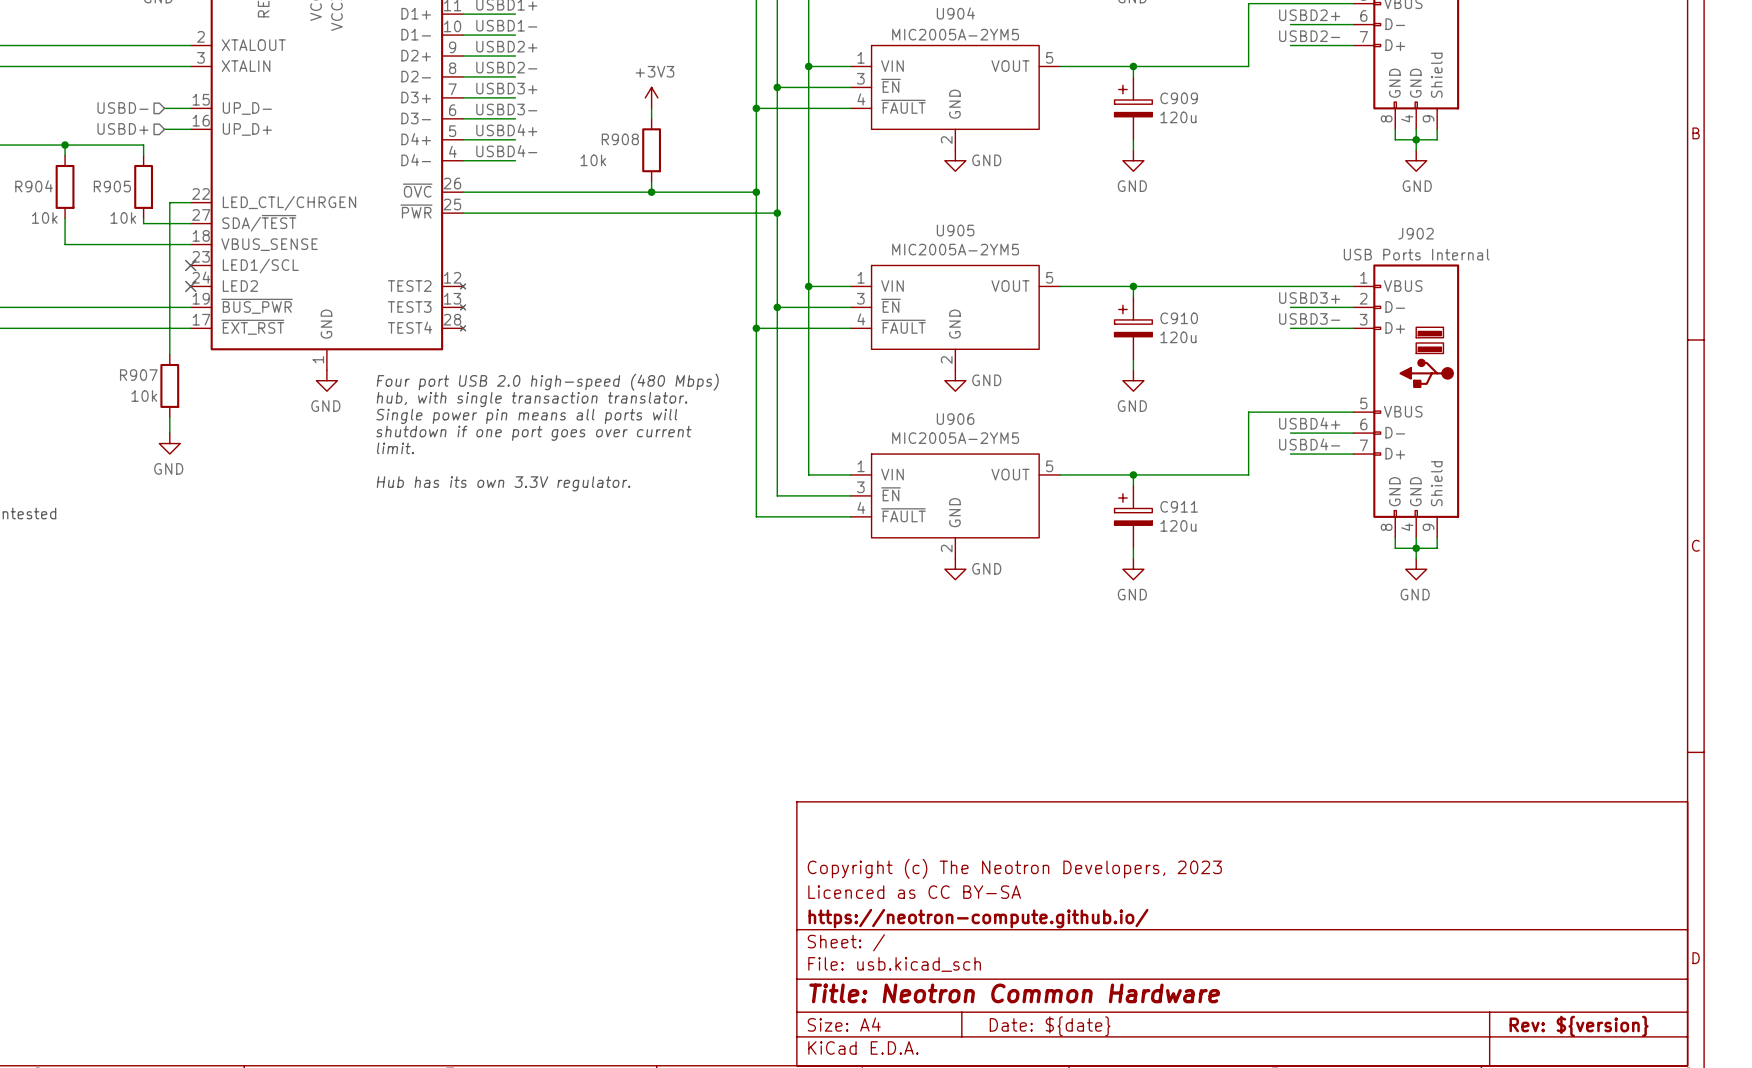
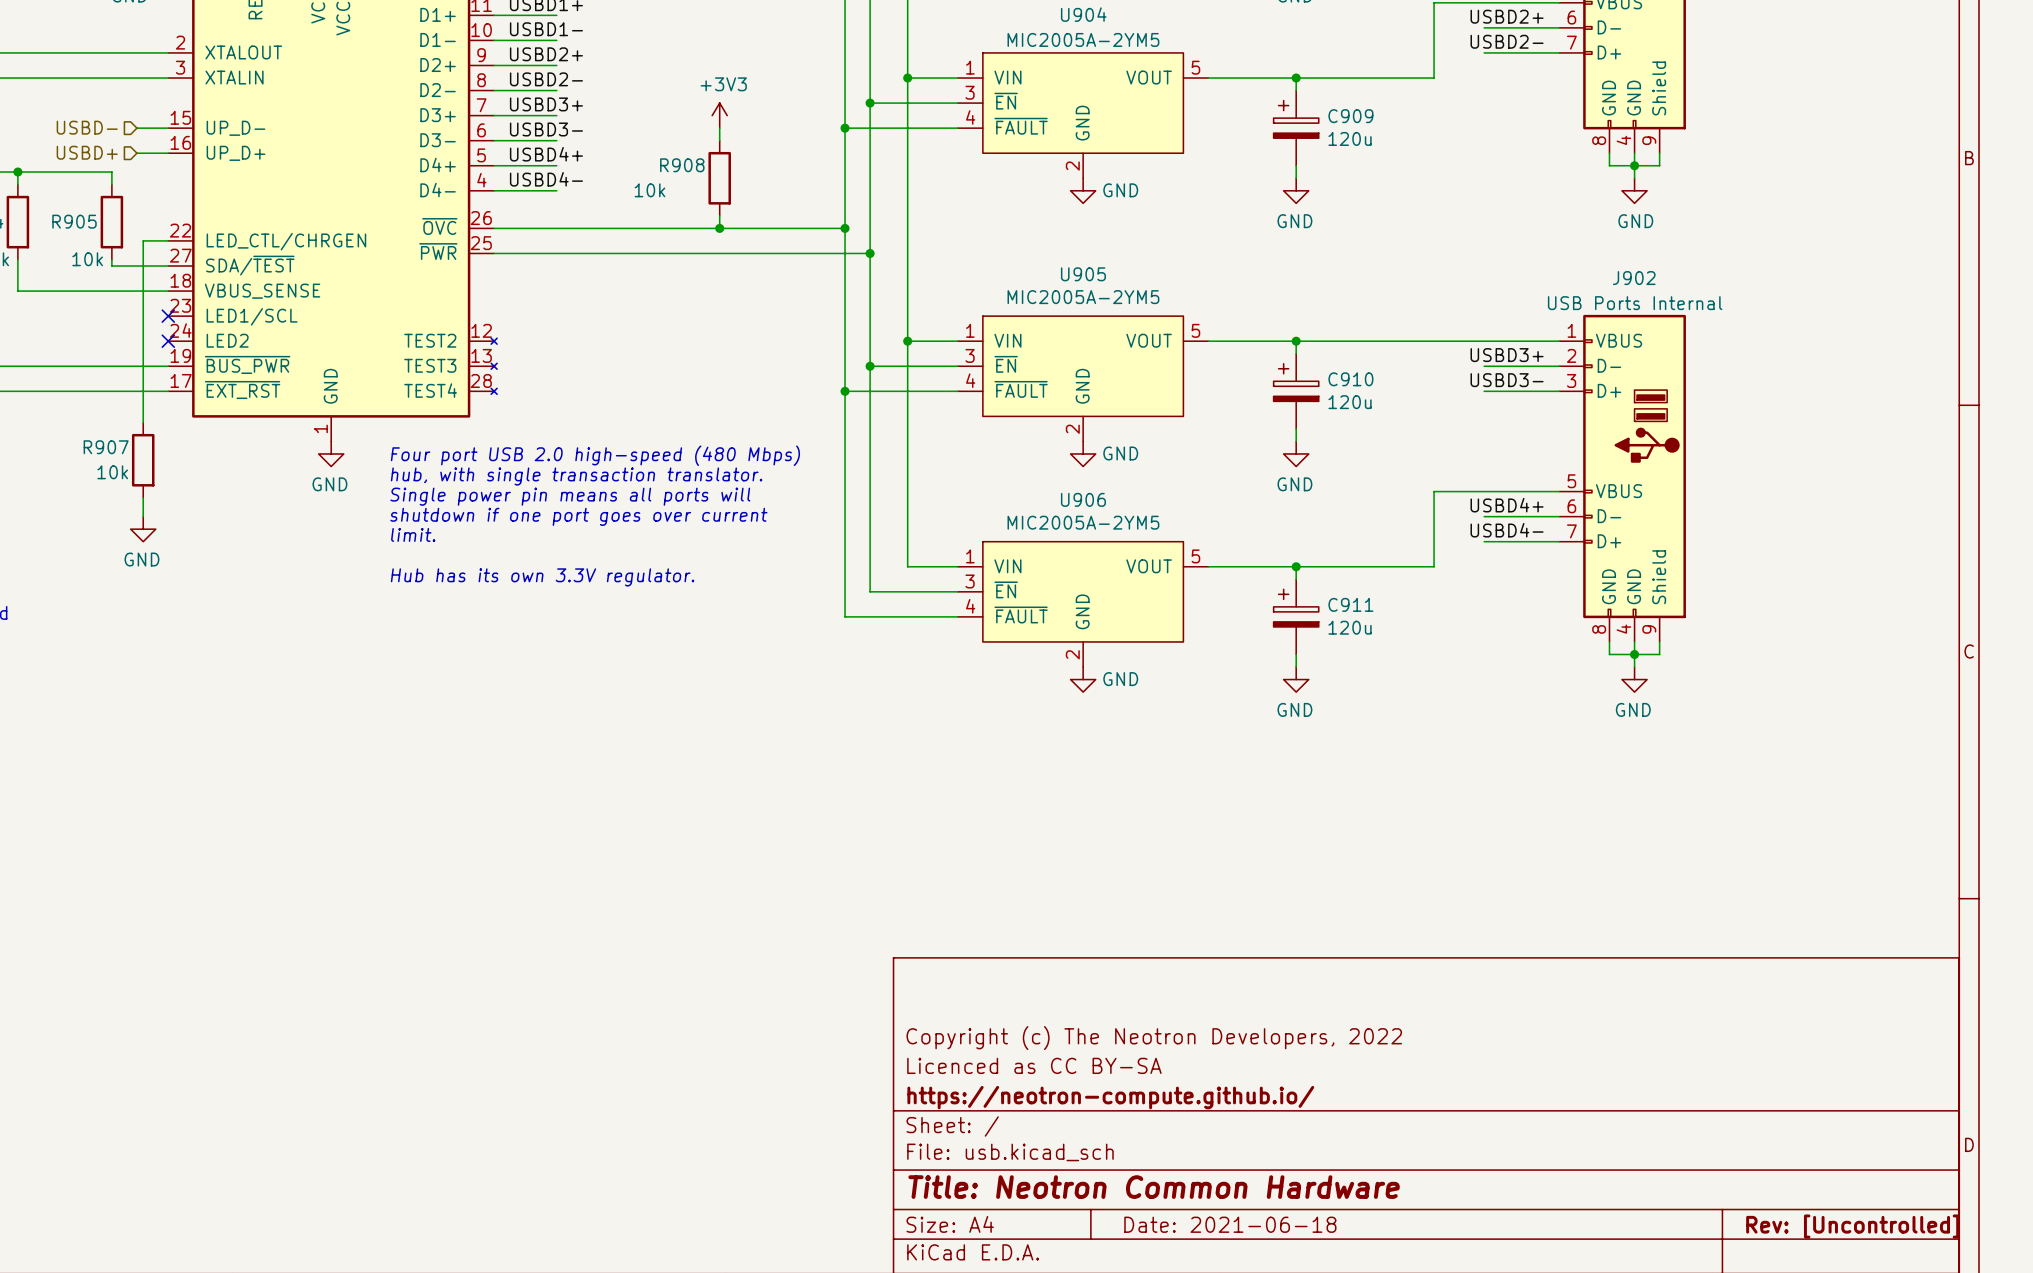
title block: Copyright (c) The Neotron Developers, 2023 (1014, 868) -> Copyright (c) The Neotron Developers, 2022 (1154, 1038)
title block: Date: ${date} (1050, 1026) -> Date: 2021-06-18 (1230, 1224)
title block: Rev: ${version} (1579, 1026) -> Rev: [Uncontrolled] (1852, 1226)

